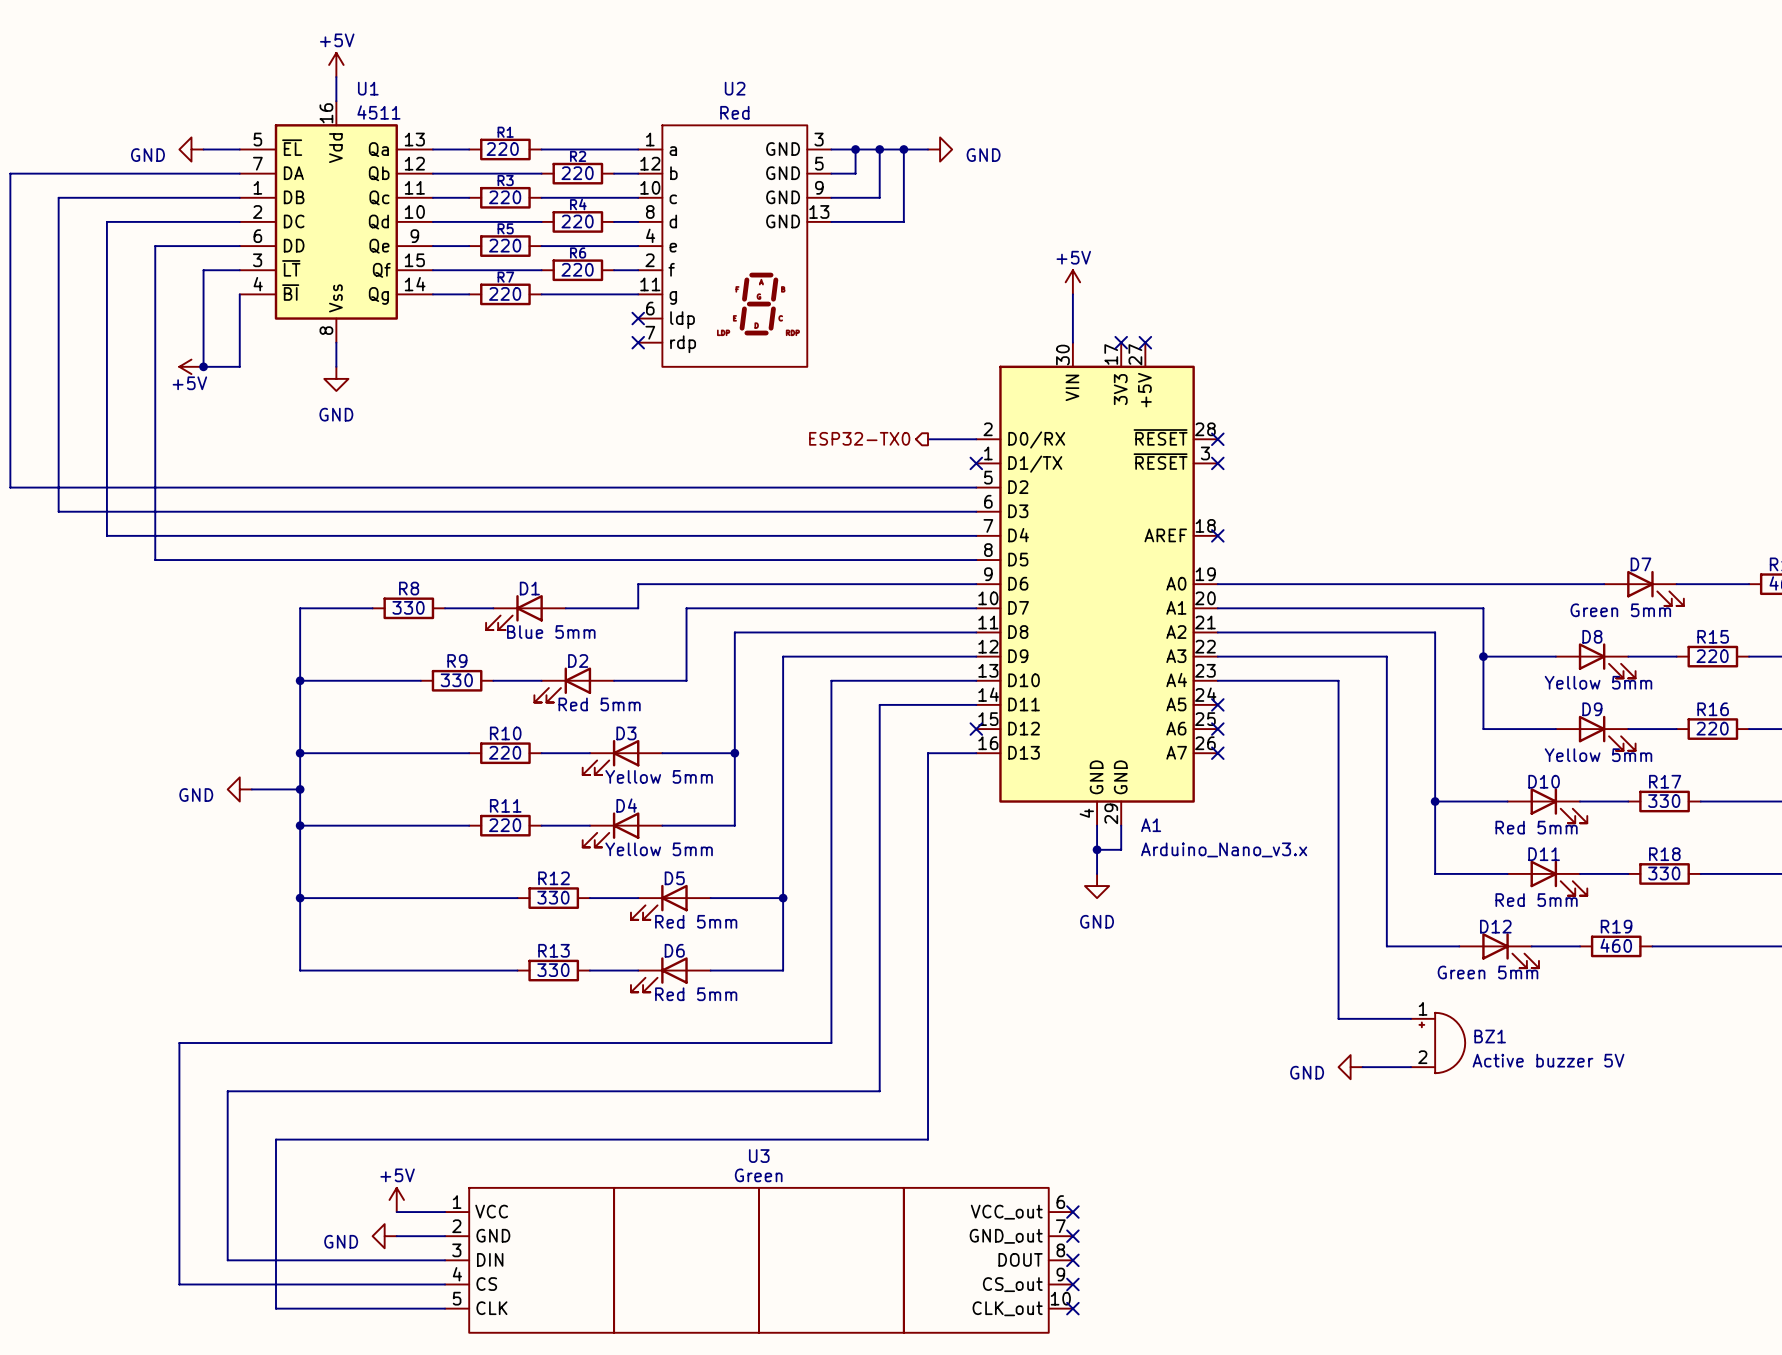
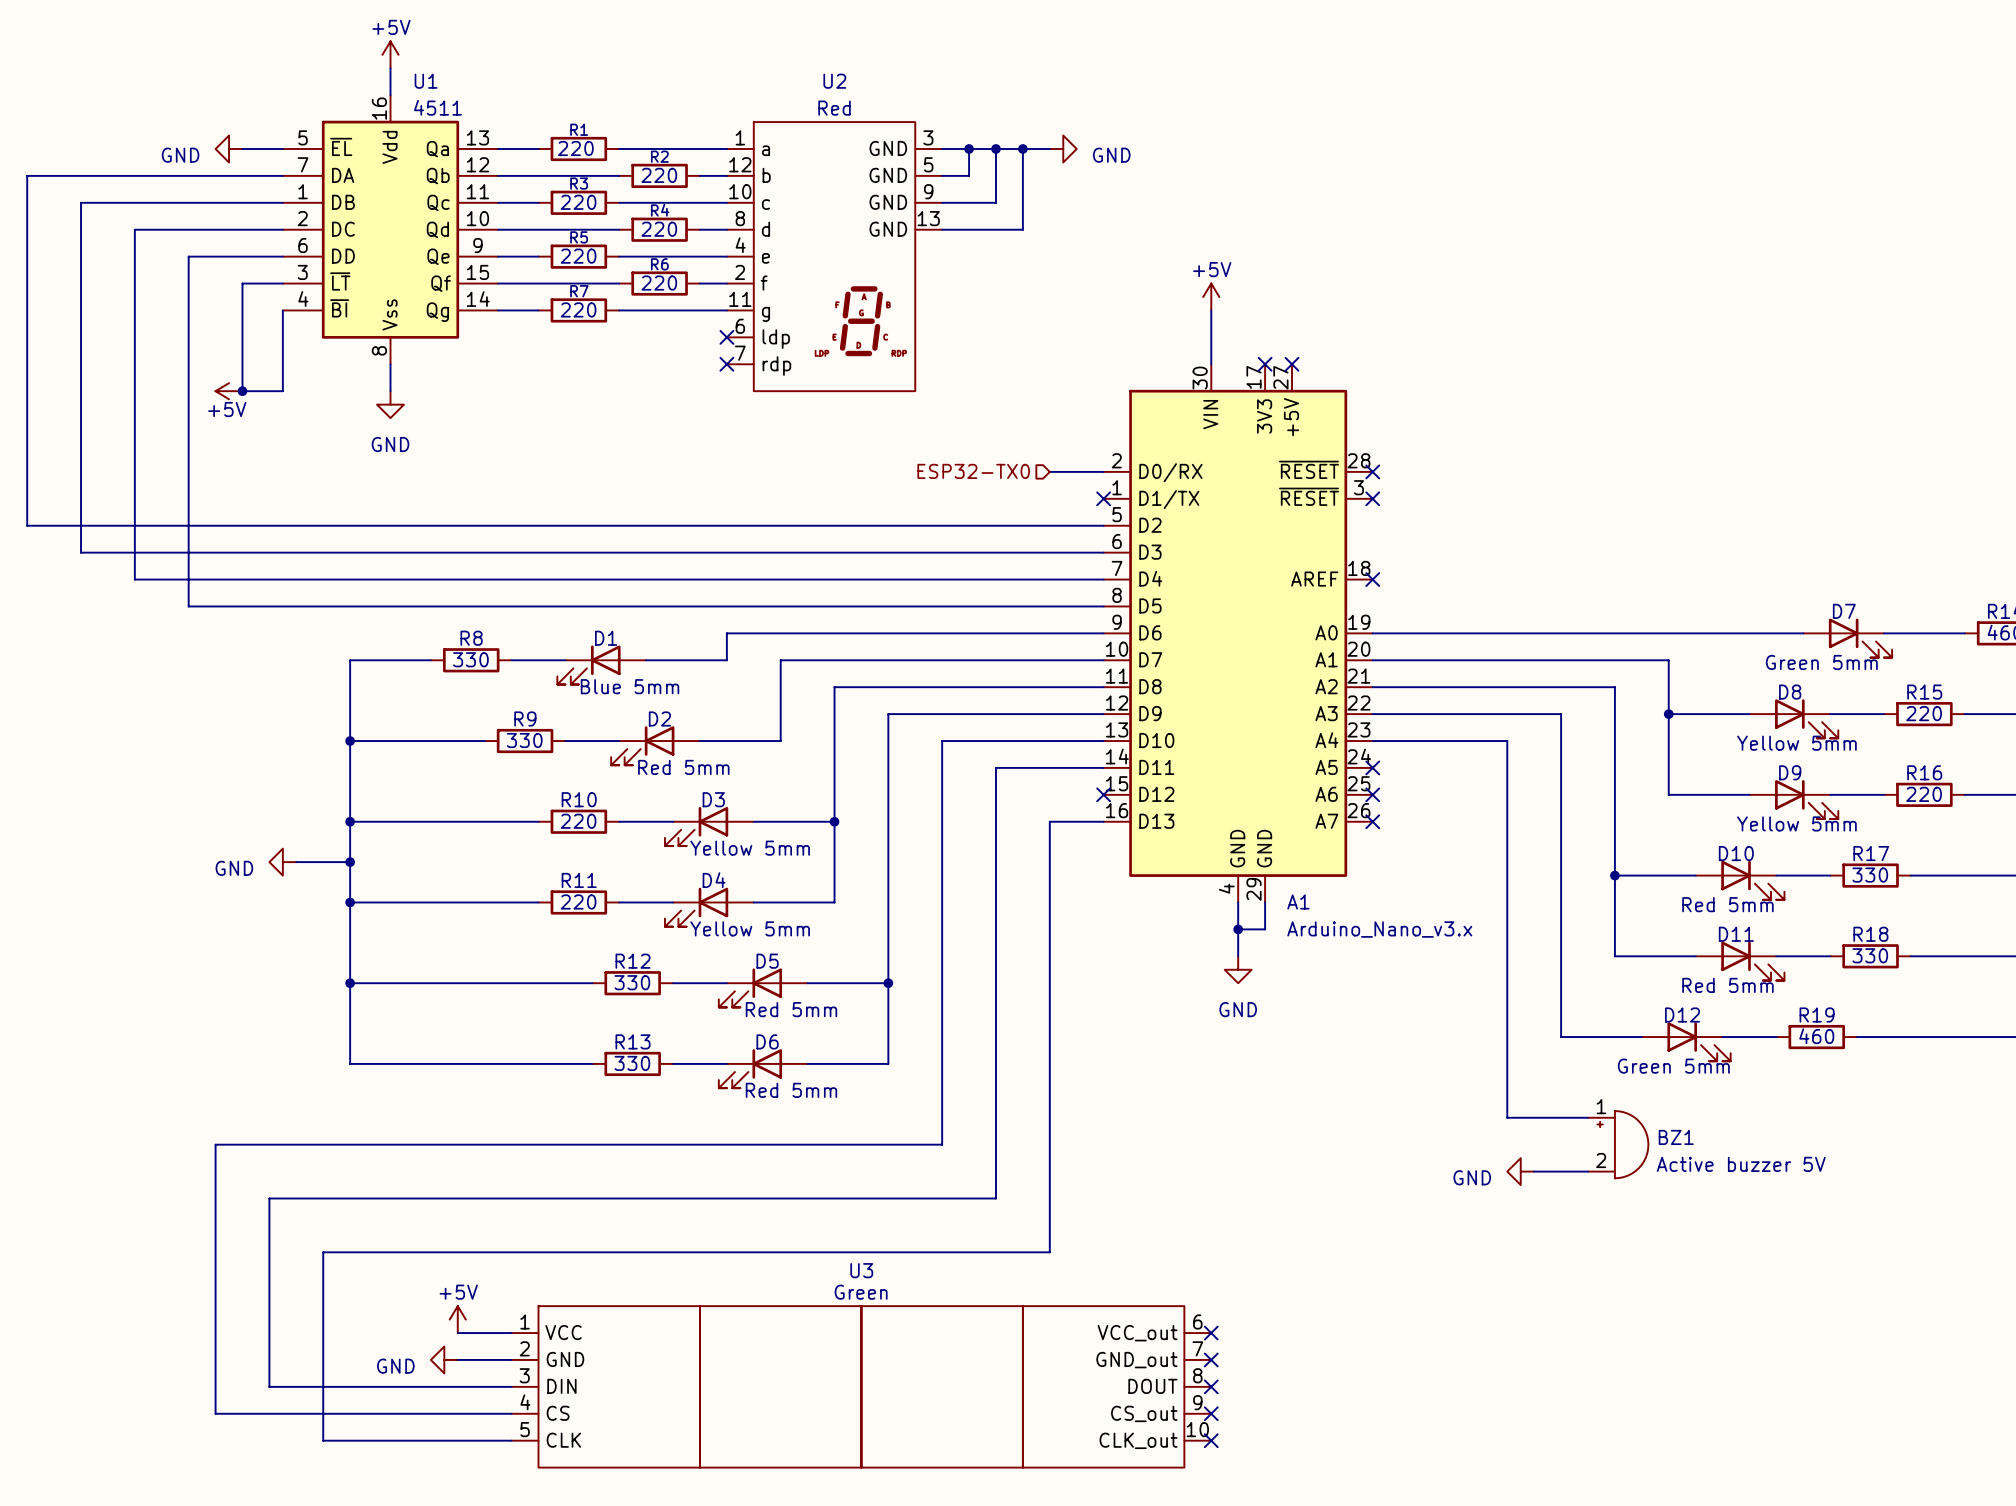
hierarchical label shape: output (859, 438) -> input (973, 471)

